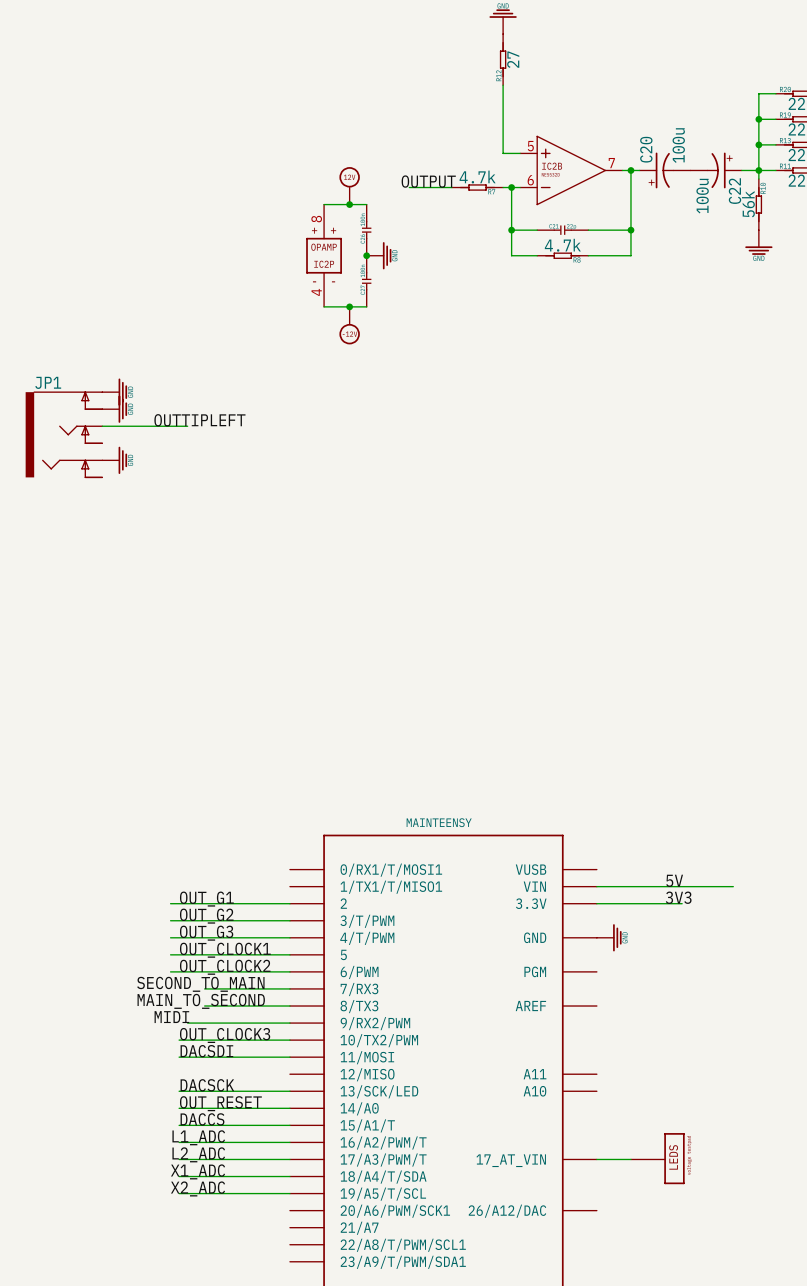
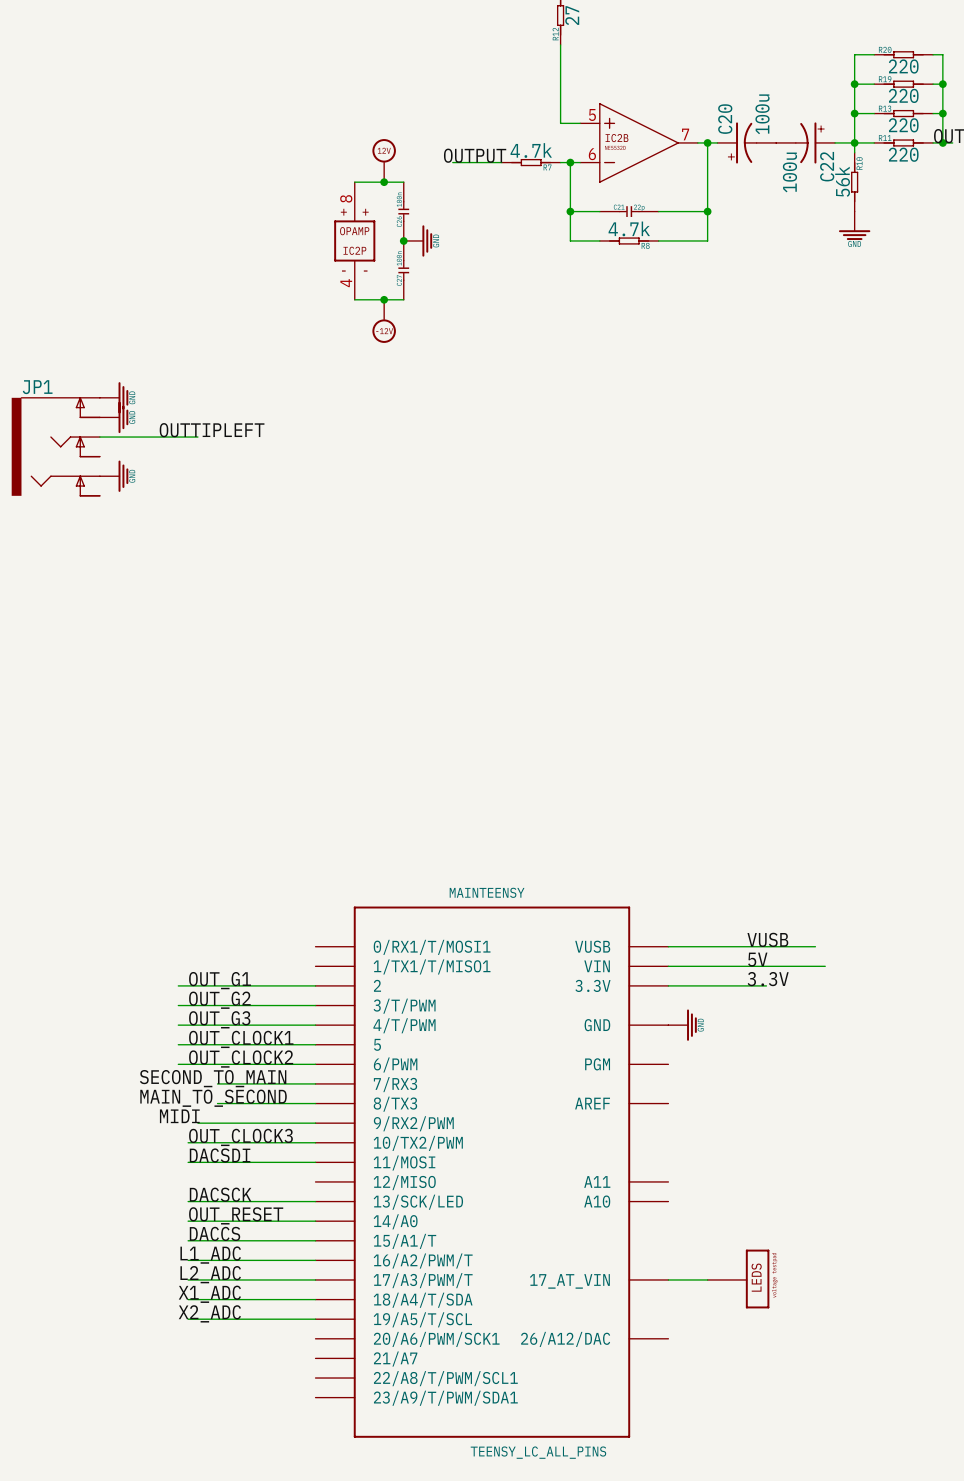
label: none -> VUSB (767, 939)
wire: none -> (668, 946) (815, 946)
label: 3V3 (678, 897) -> 3.3V (768, 979)

